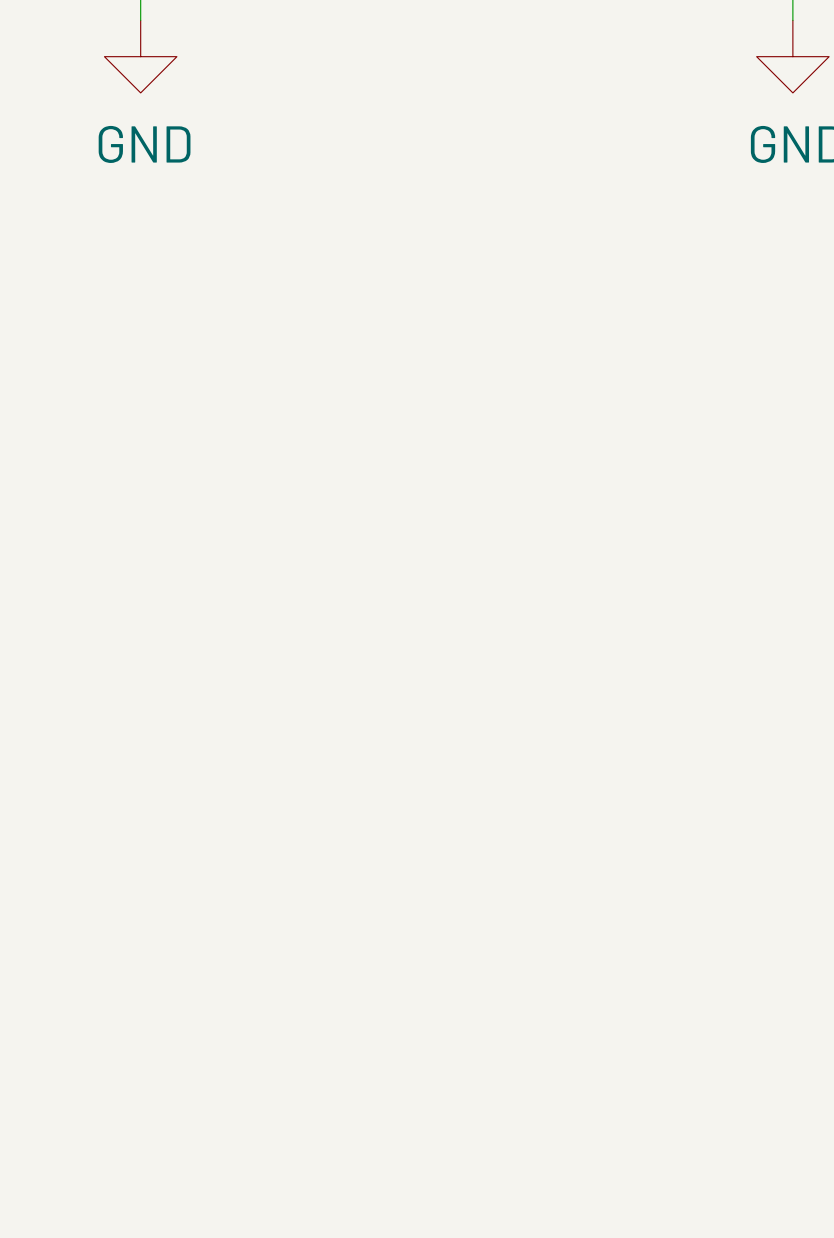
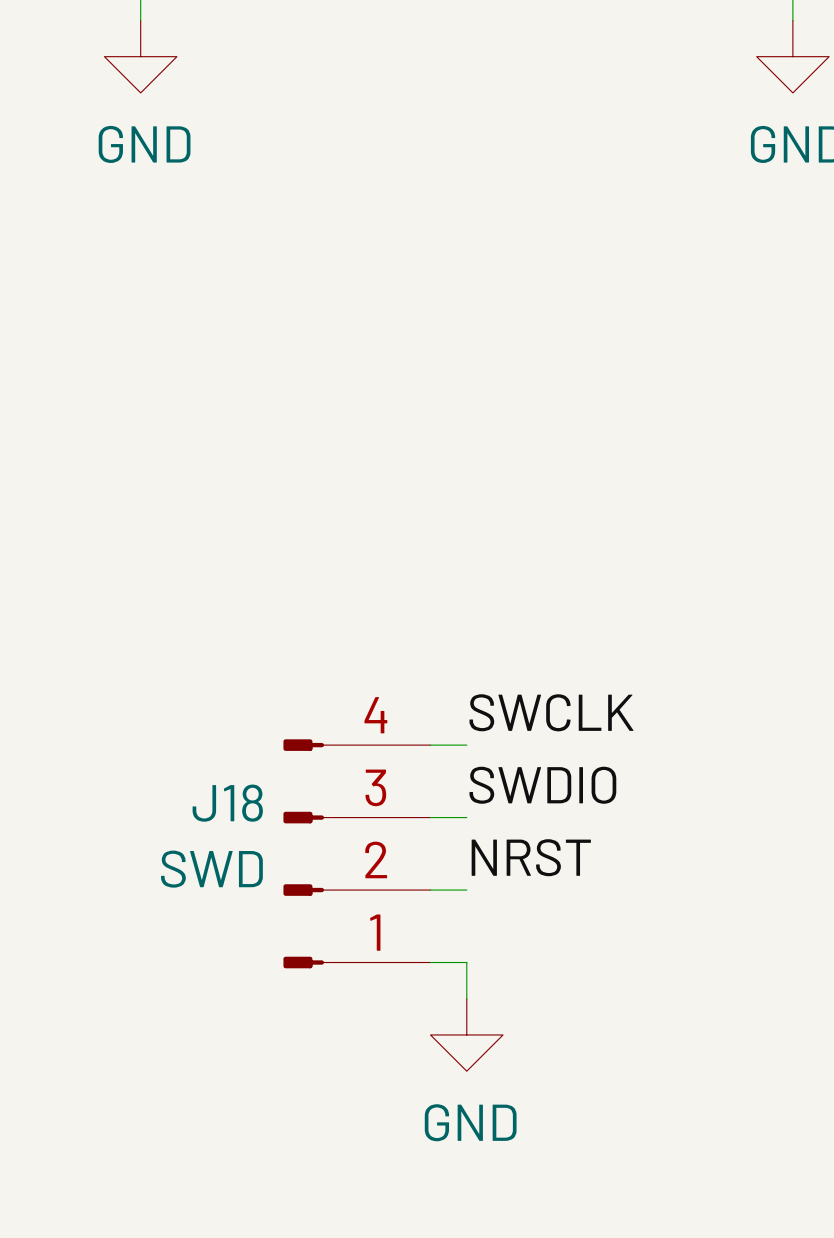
label: none -> SWCLK (551, 712)
wire: none -> (430, 745) (466, 745)
label: none -> SWDIO (542, 785)
wire: none -> (430, 817) (466, 817)
J18: none -> SWD (357, 853)
label: none -> NRST (531, 857)
wire: none -> (430, 890) (466, 890)
wire: none -> (430, 962) (466, 962) (466, 998)
power symbol: none -> GND (466, 1034)

